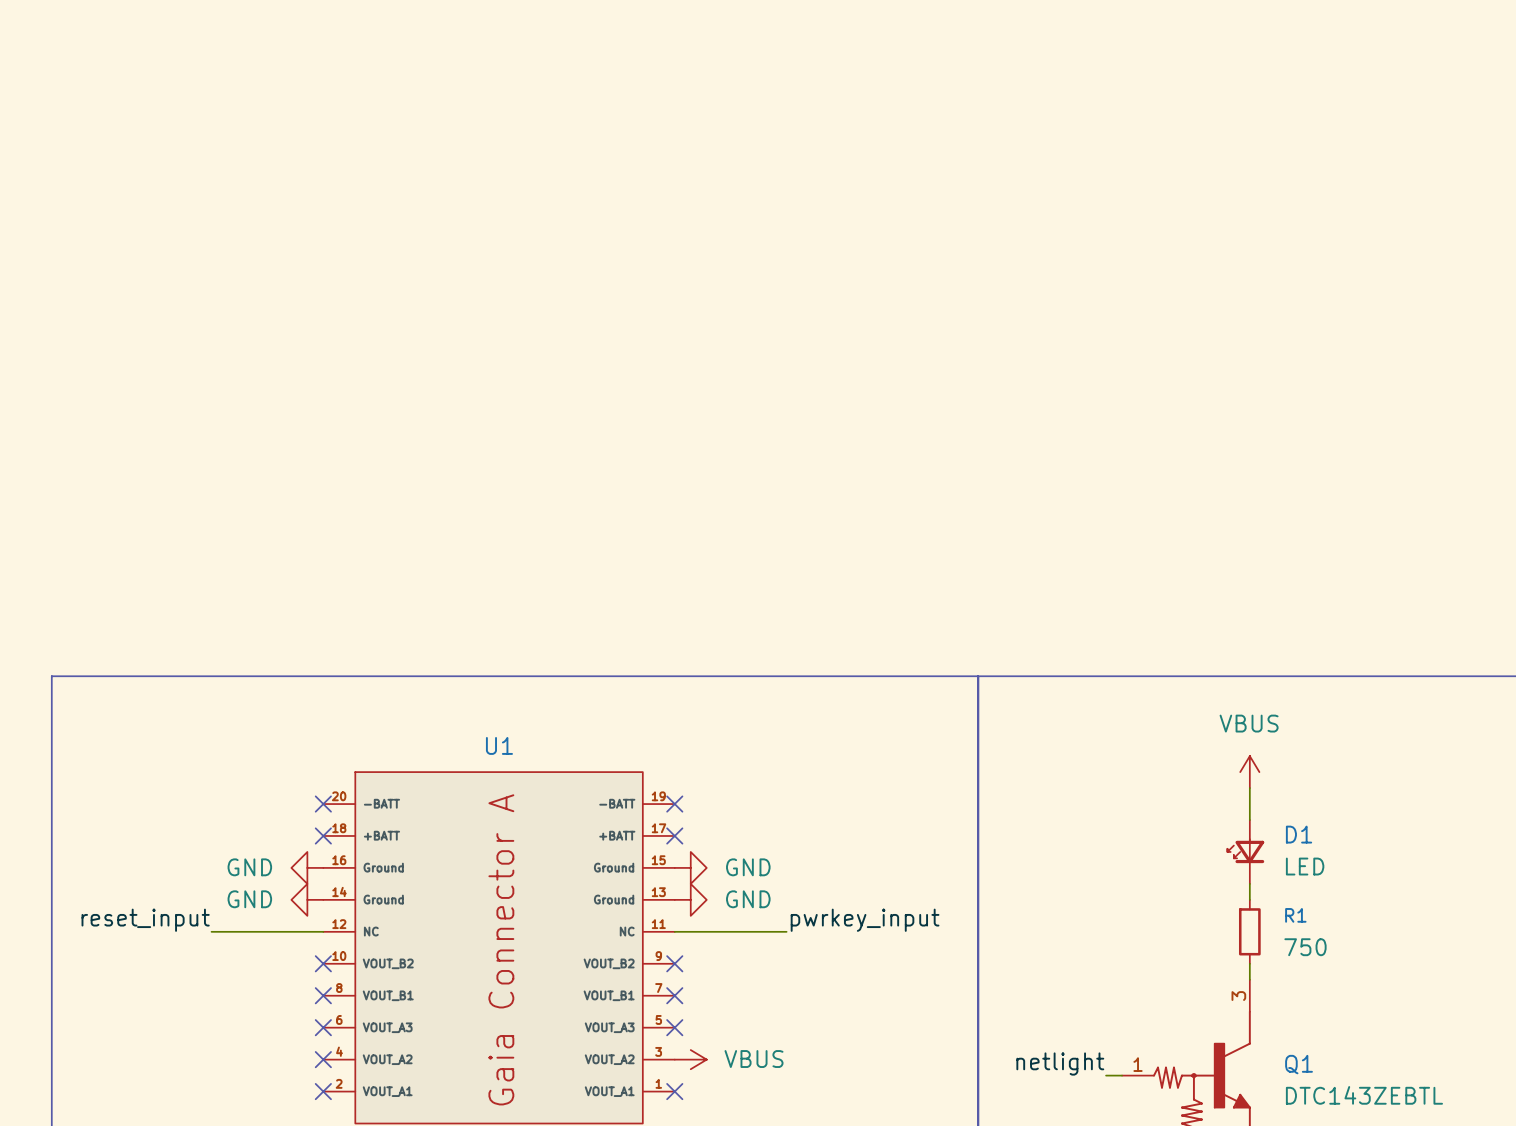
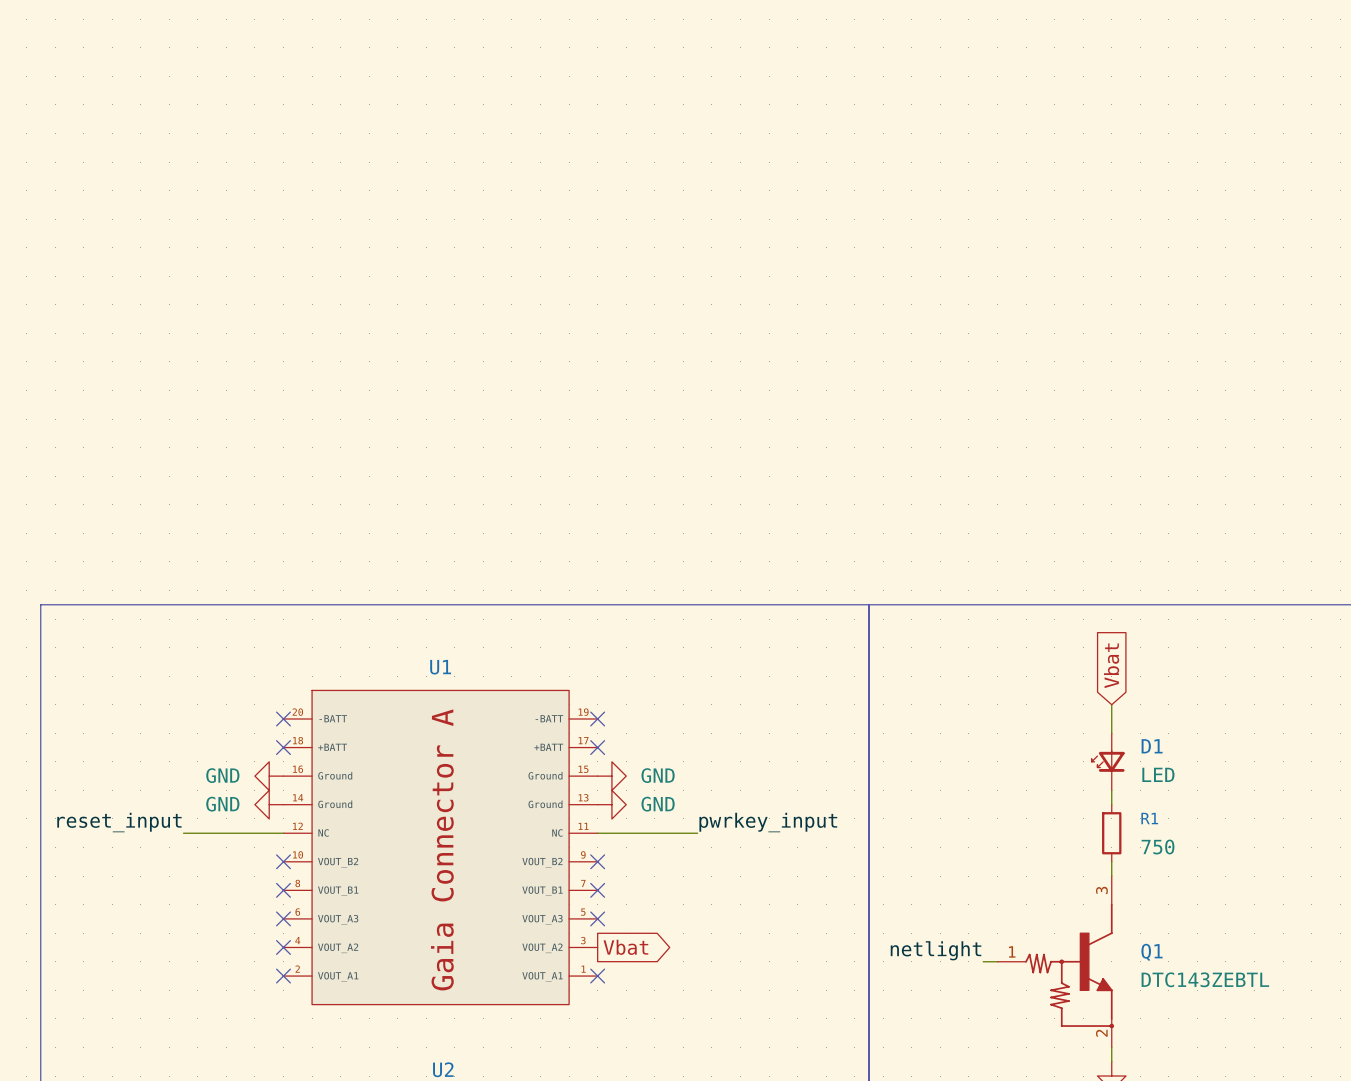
global label: none -> Vbat (1111, 665)
power symbol: VBUS (1249, 772) -> none
power symbol: VBUS (690, 1059) -> none
global label: none -> Vbat (625, 947)

